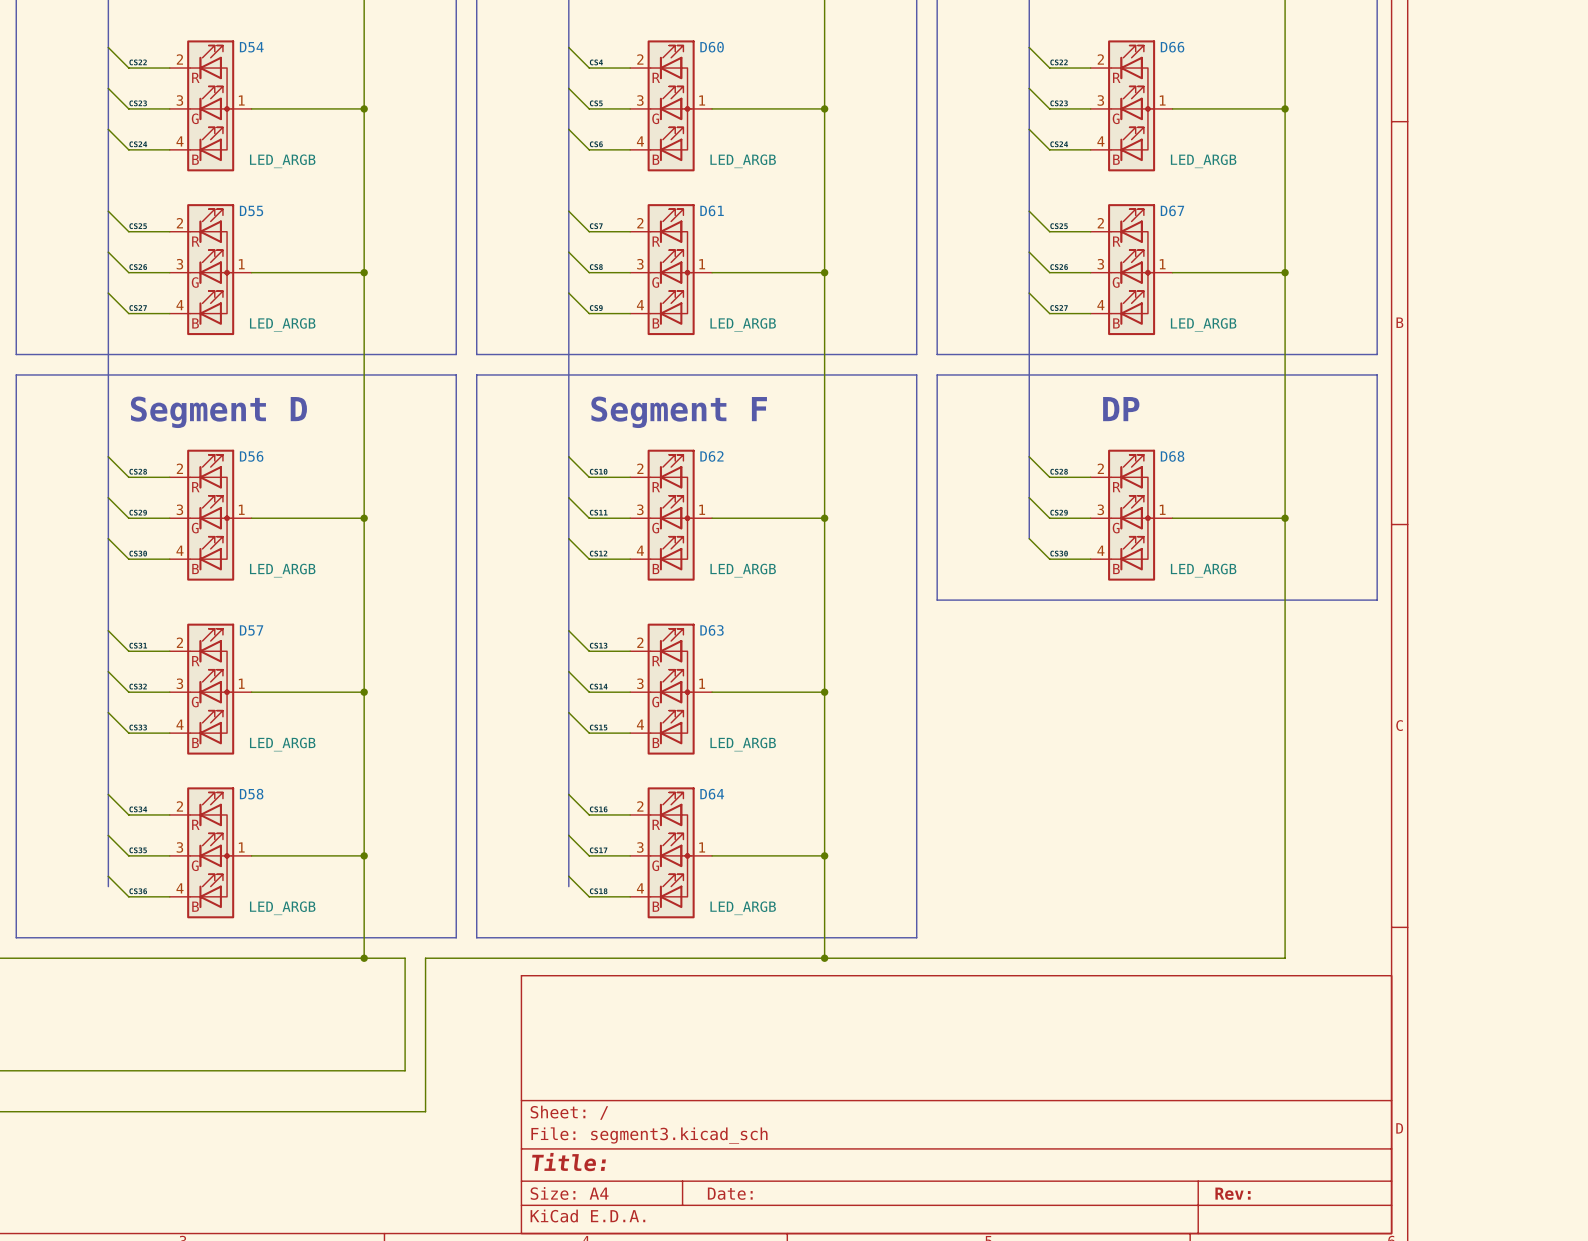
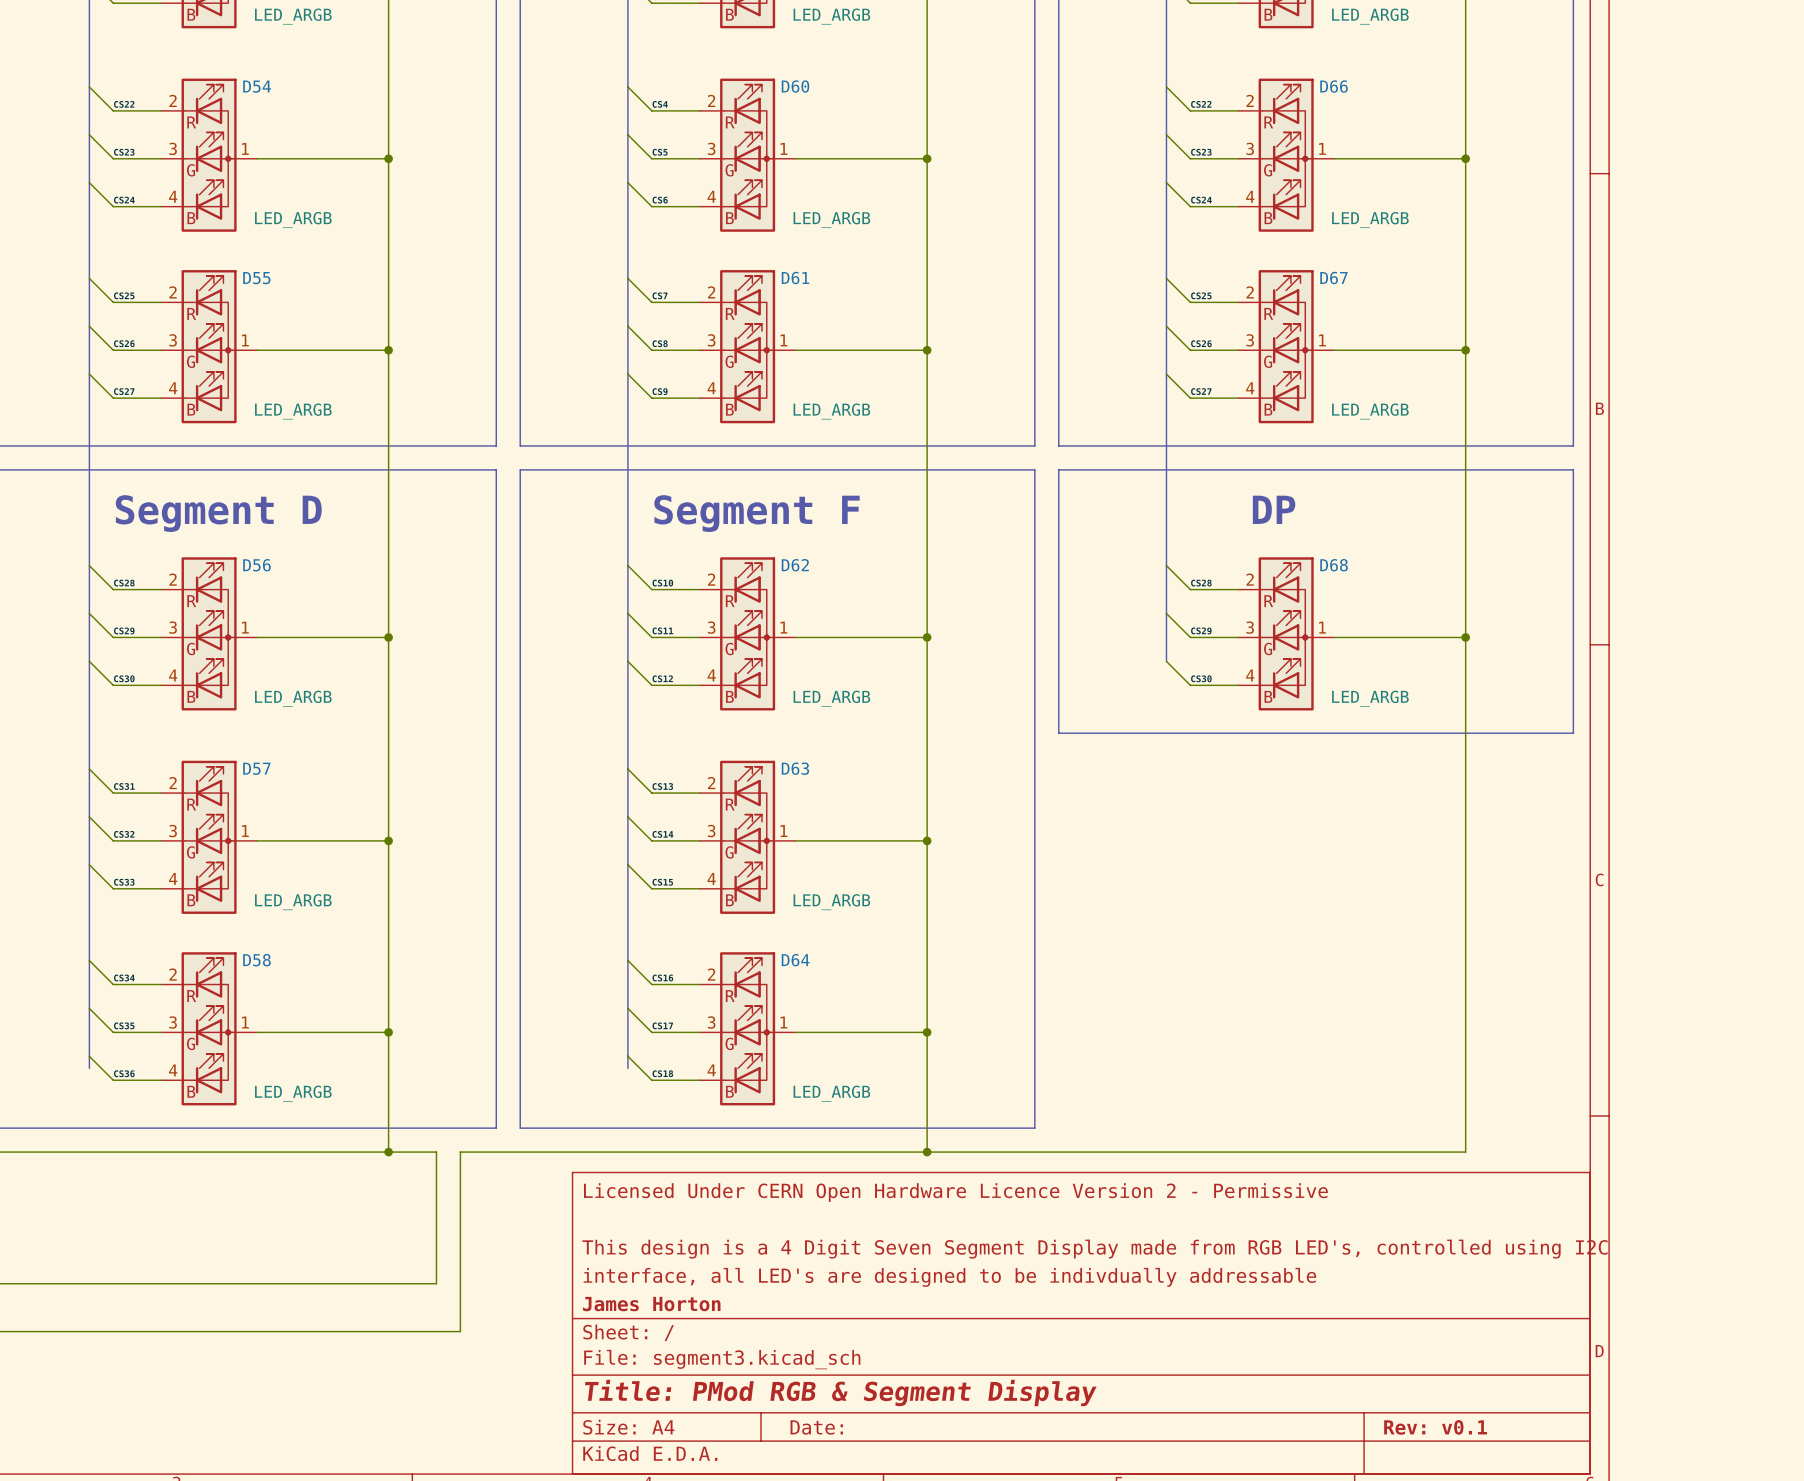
title block: none -> Licensed Under CERN Open Hardware Licence Version 2 - Permissive (955, 1192)
title block: none -> This design is a 4 Digit Seven Segment Display made from RGB LED's, controlled using I2C (1094, 1249)
title block: none -> interface, all LED's are designed to be indivdually addressable (949, 1277)
title block: none -> James Horton (651, 1304)
title block: Title: (569, 1162) -> Title: PMod RGB & Segment Display (840, 1392)
title block: Rev: (1233, 1193) -> Rev: v0.1 (1435, 1427)

